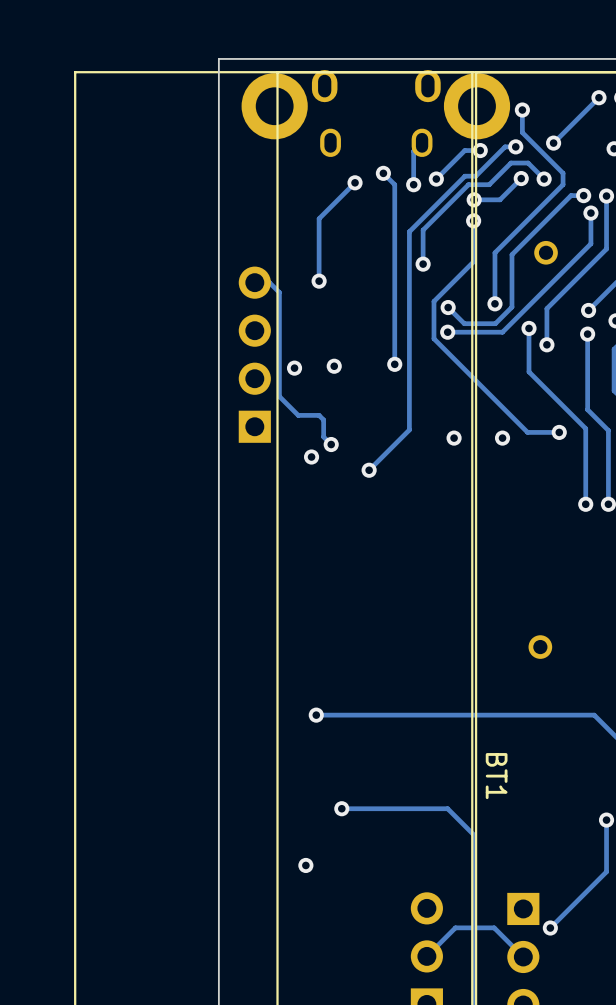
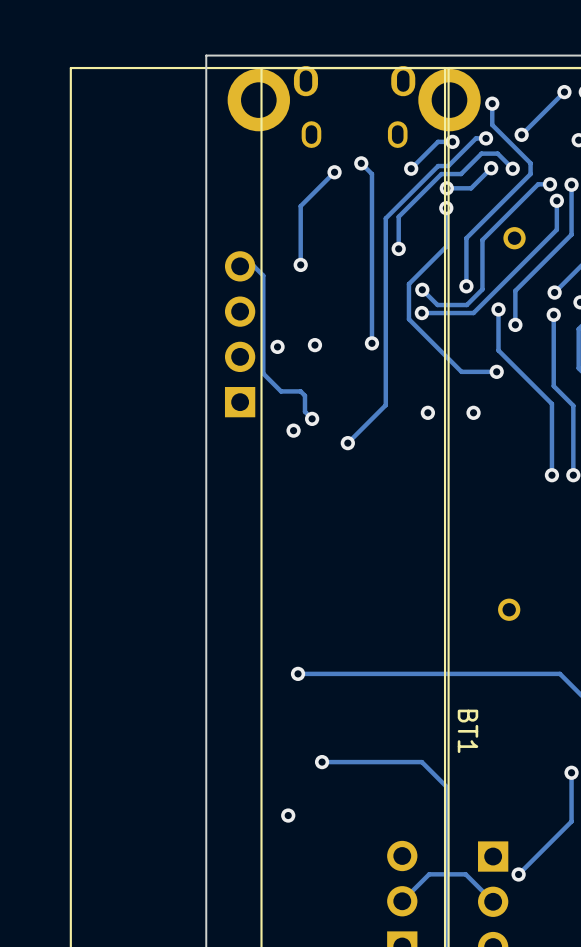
track: (422, 142) (413, 151) (413, 184) -> none
via: (413, 184) -> none
track: (489, 394) (527, 432) (559, 432) -> (461, 371) (496, 371)
via position: (559, 432) -> (496, 371)

